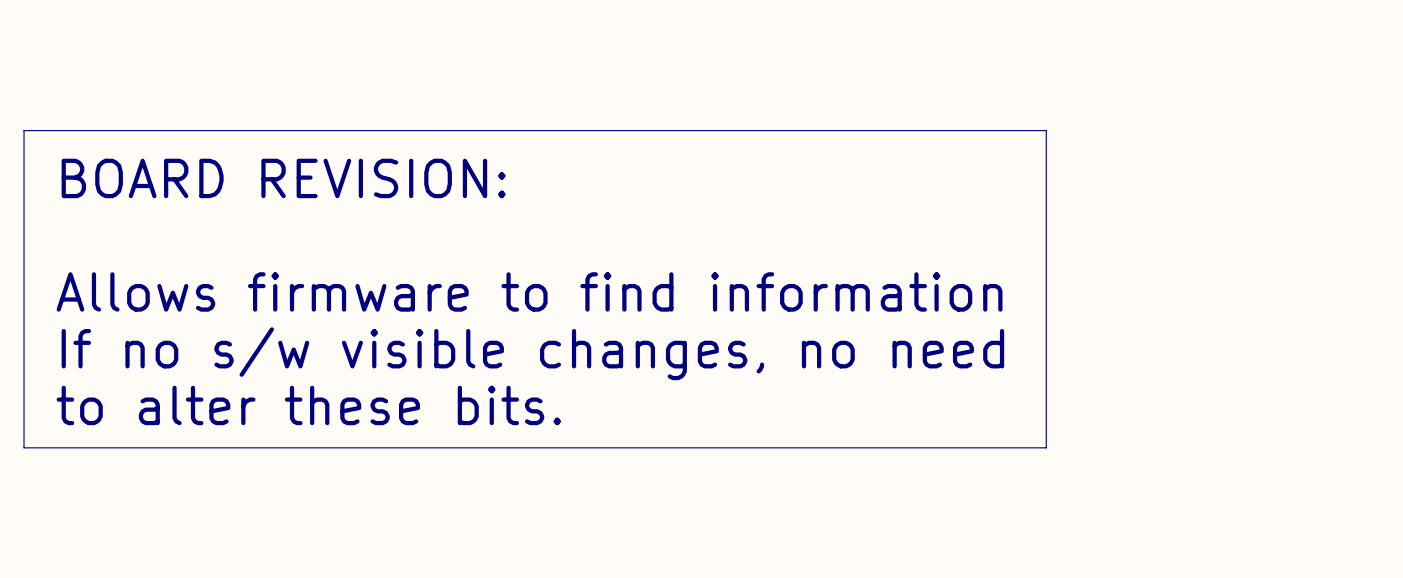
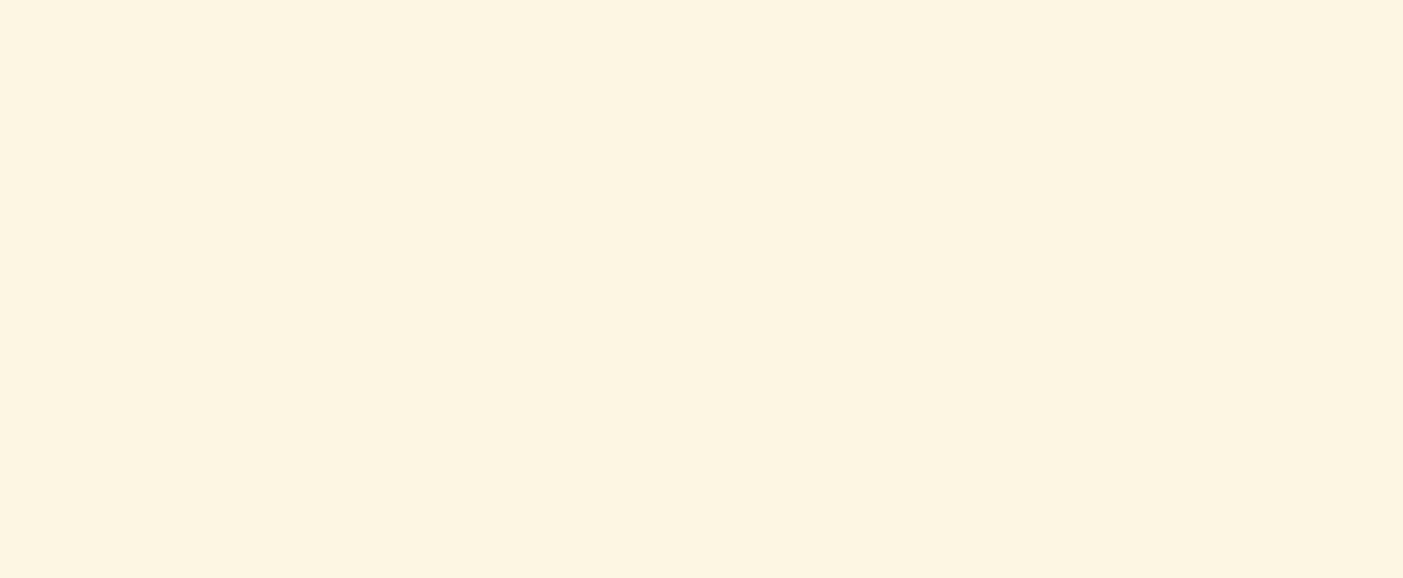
line: (24, 130) (1046, 130) (1046, 447) (24, 447) (24, 130) -> none
text: BOARD REVISION: (283, 178) -> none
text: Allows firmware to find information (529, 291) -> none
text: If no s/w visible changes, no need (532, 353) -> none
text: to alter these bits. (308, 405) -> none

